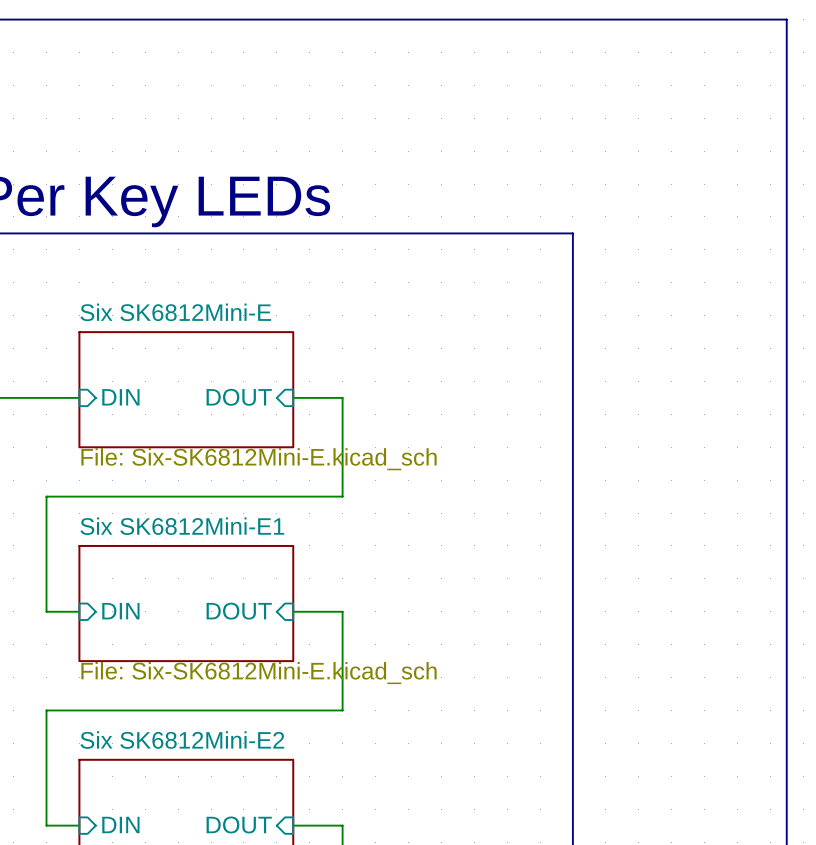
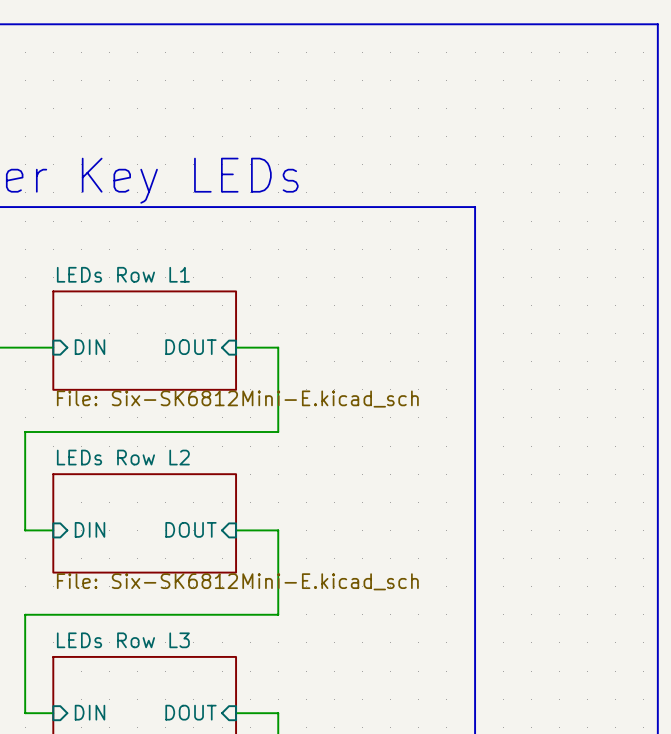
sheet Six SK6812Mini-E name: Six SK6812Mini-E (175, 312) -> LEDs Row L1 (123, 274)
sheet Six SK6812Mini-E1 name: Six SK6812Mini-E1 (182, 526) -> LEDs Row L2 (123, 457)
sheet Six SK6812Mini-E2 name: Six SK6812Mini-E2 (182, 740) -> LEDs Row L3 (123, 640)

